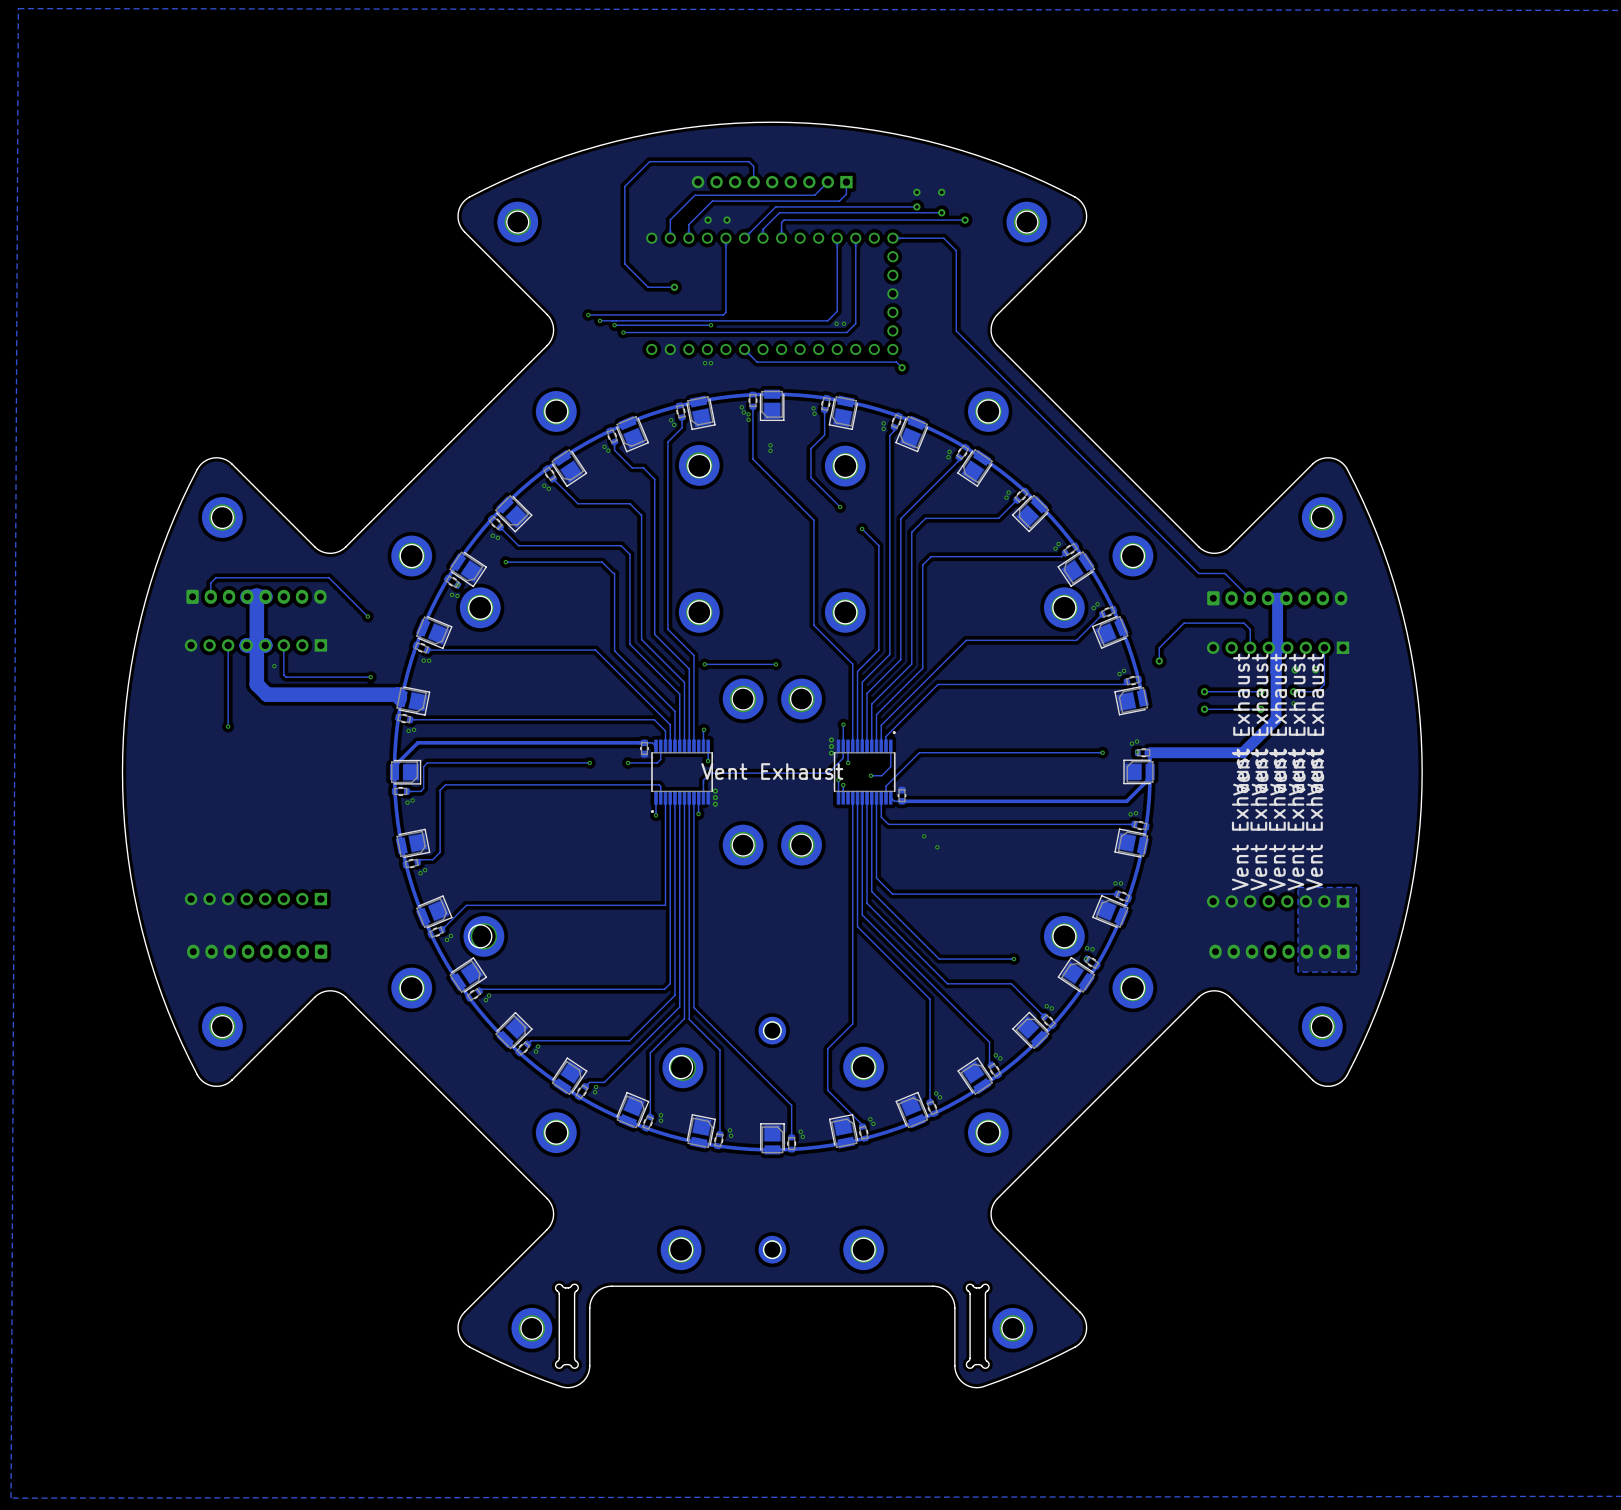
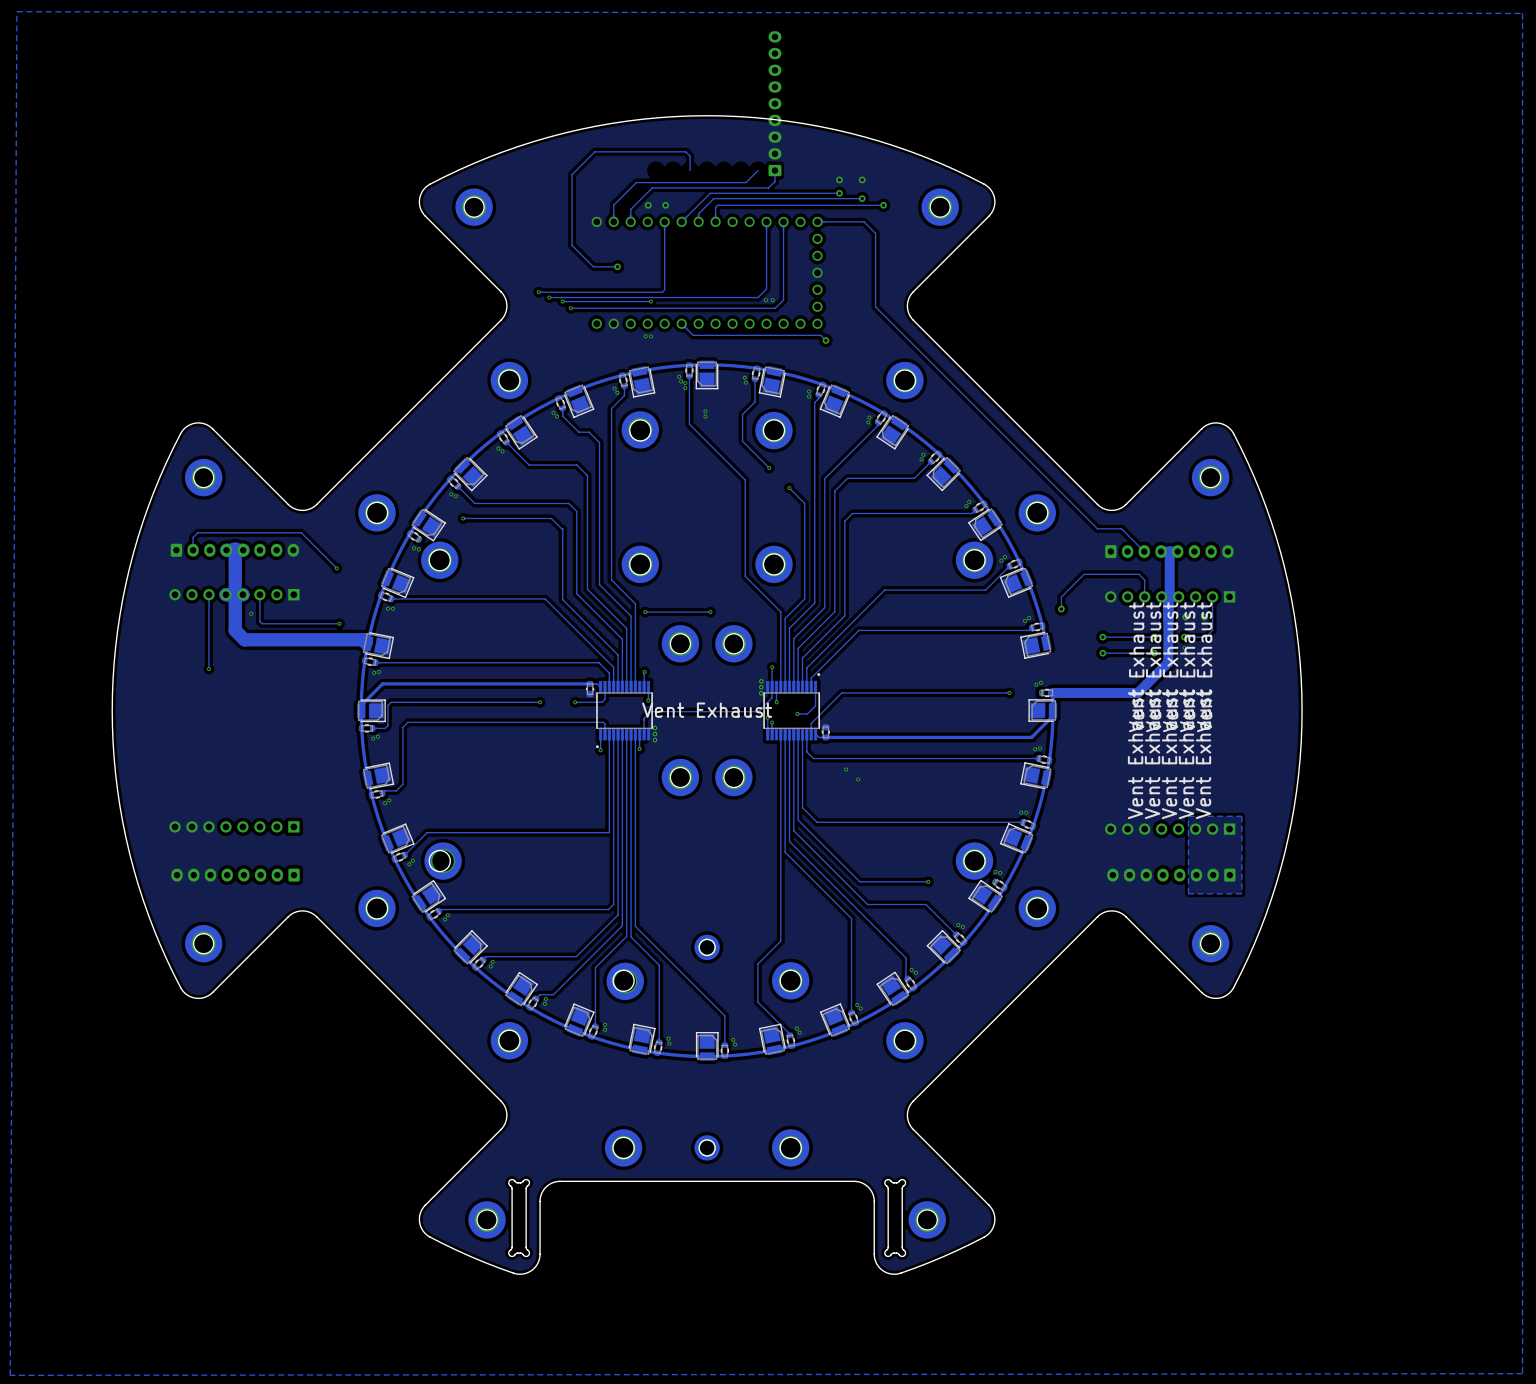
part: none -> (774, 103)
part: (772, 182) -> none

